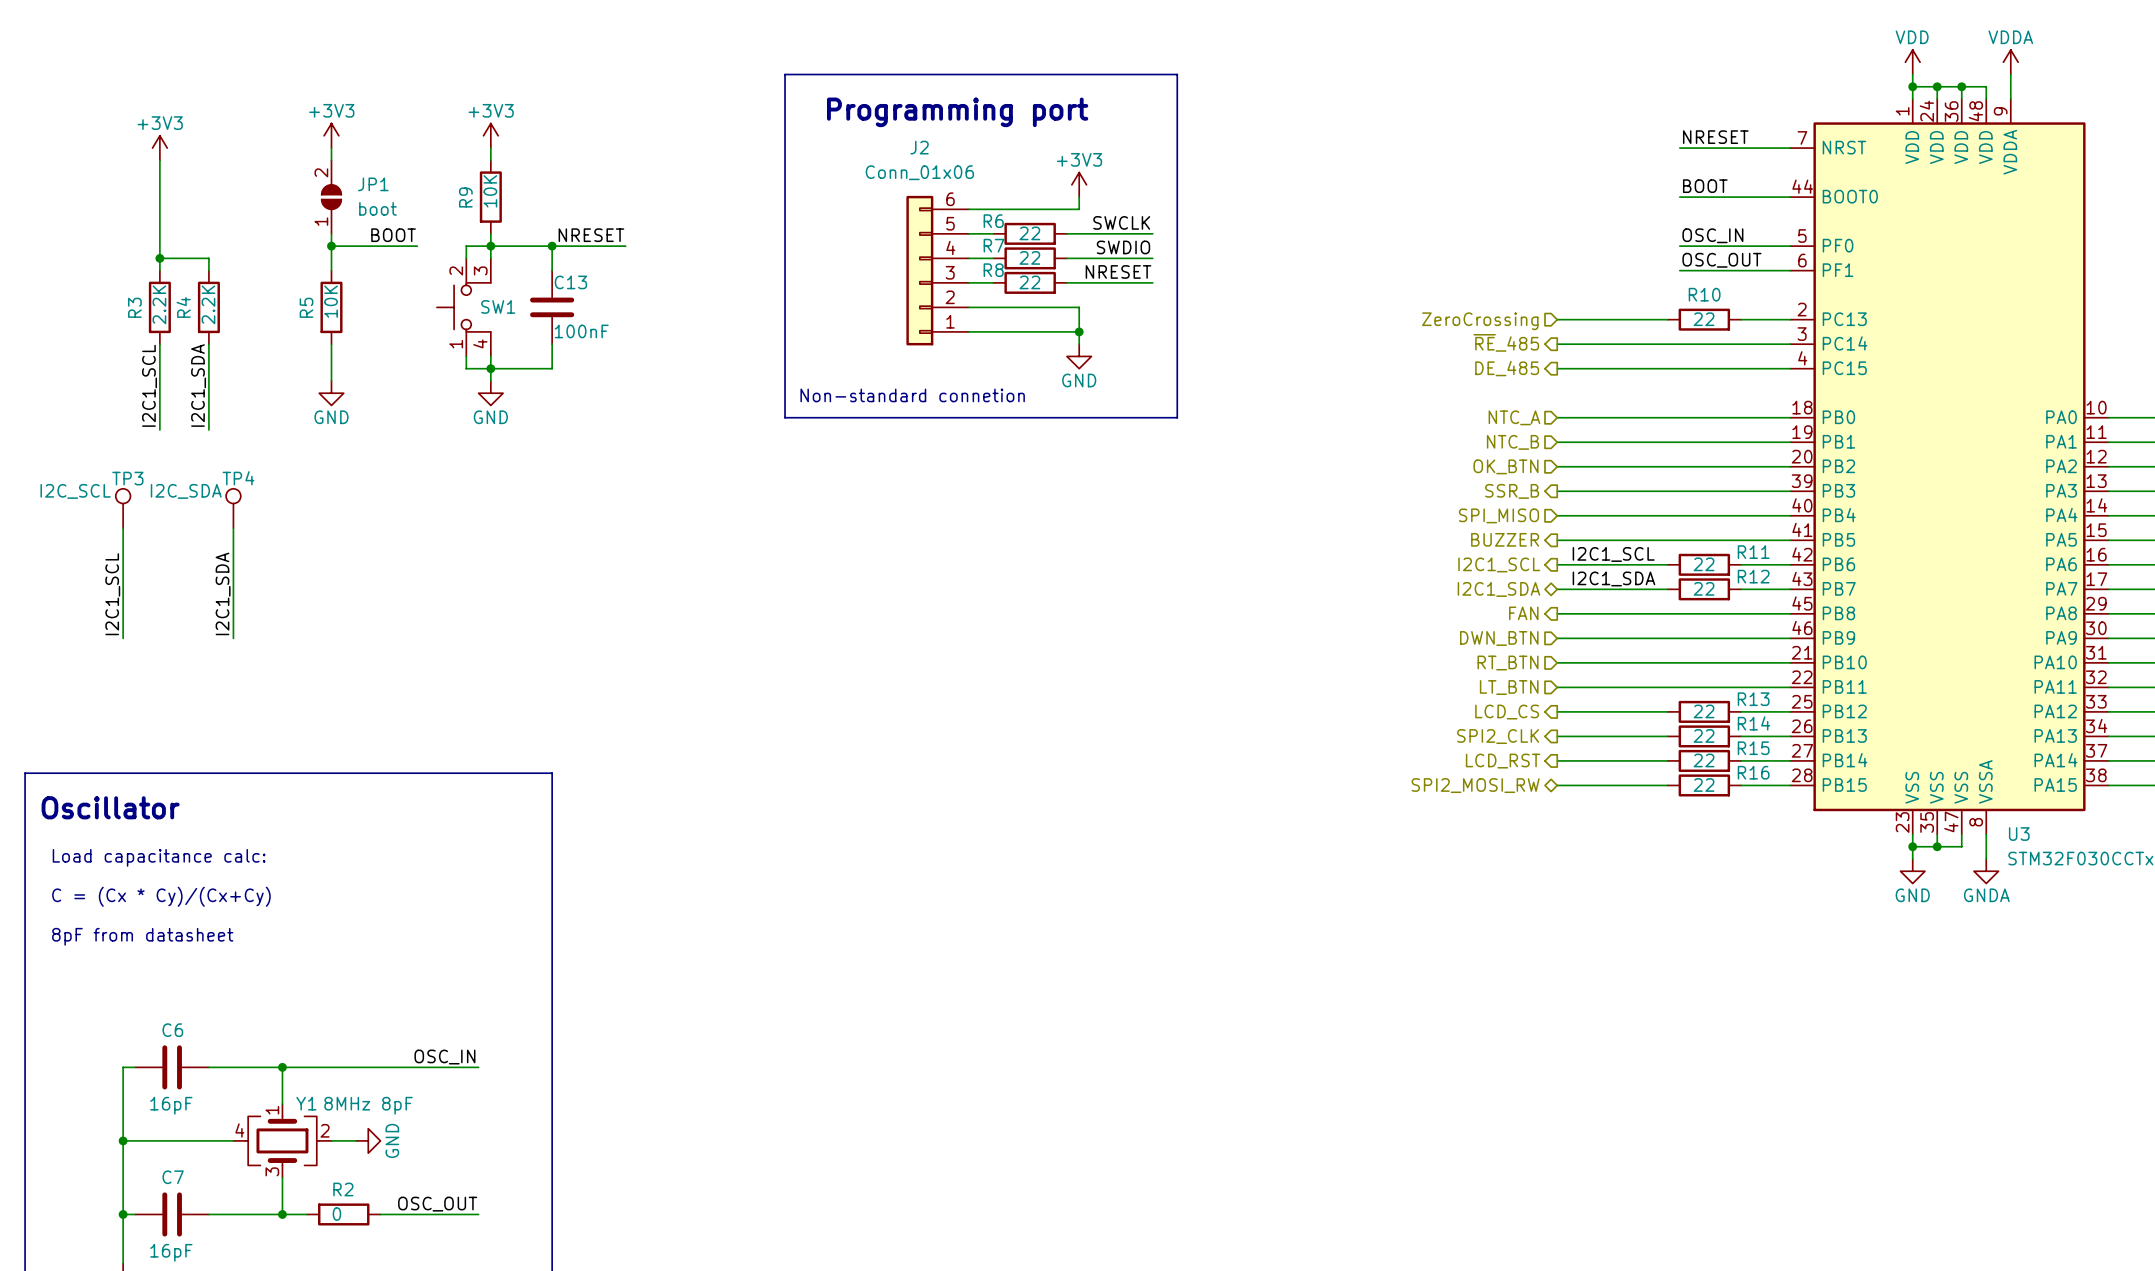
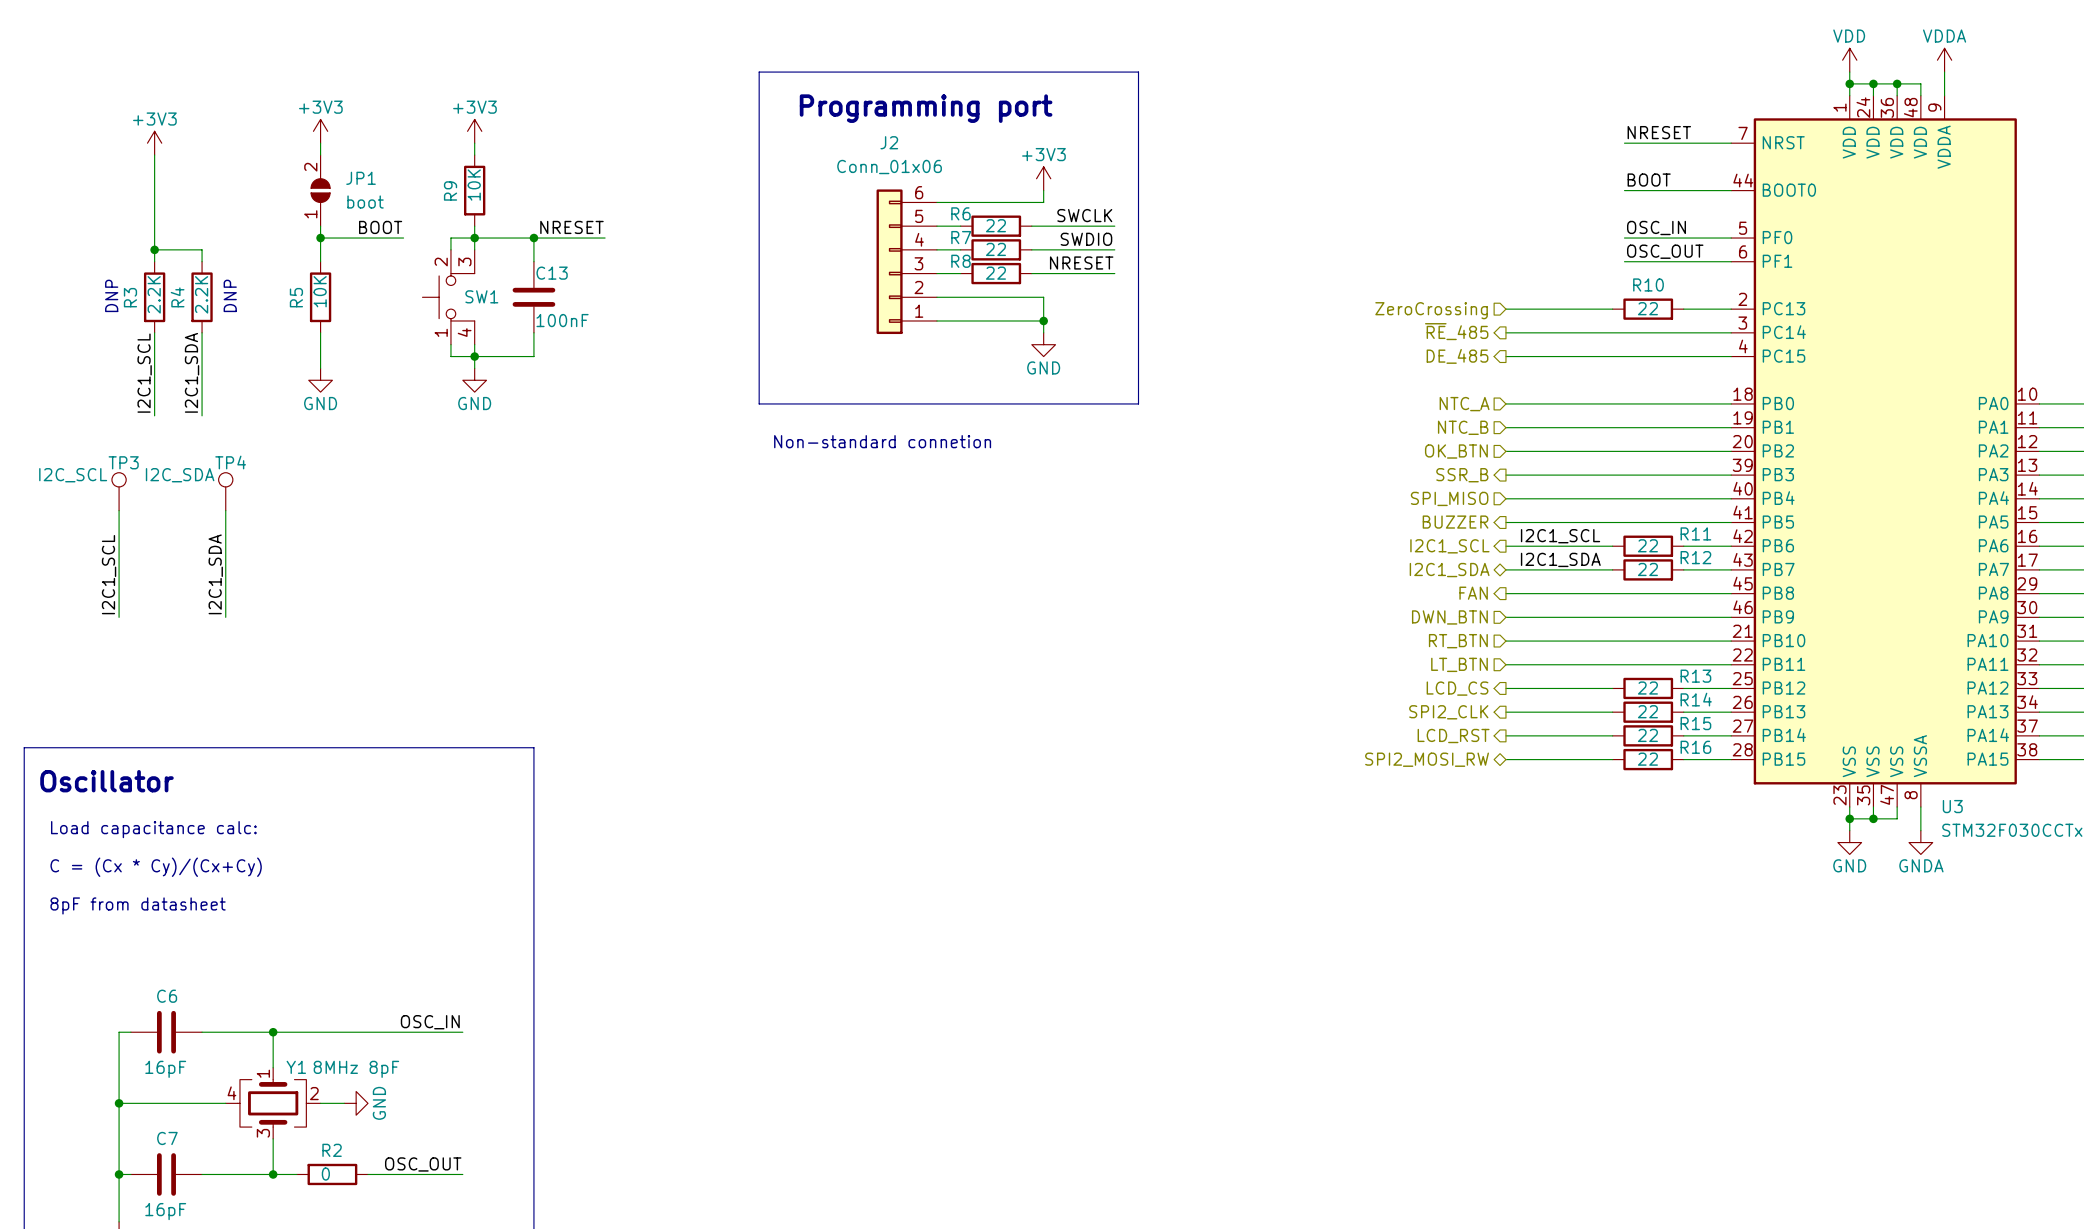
text: none -> DNP (111, 295)
text: none -> DNP (230, 295)
text position: Non-standard connetion (912, 395) -> Non-standard connetion (882, 441)

